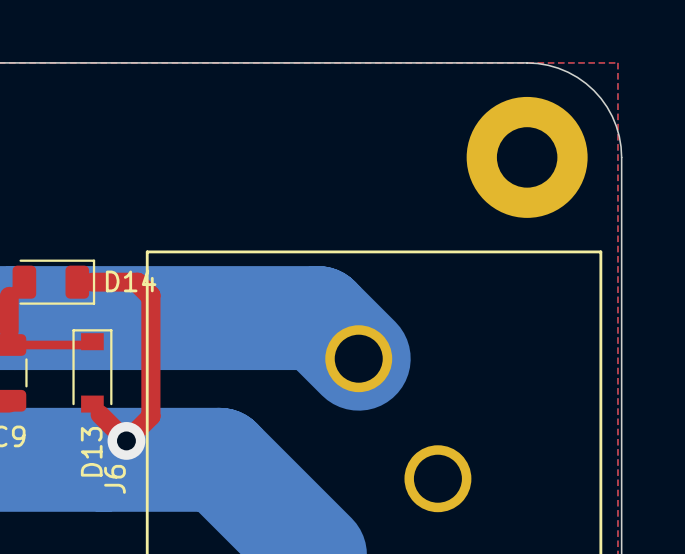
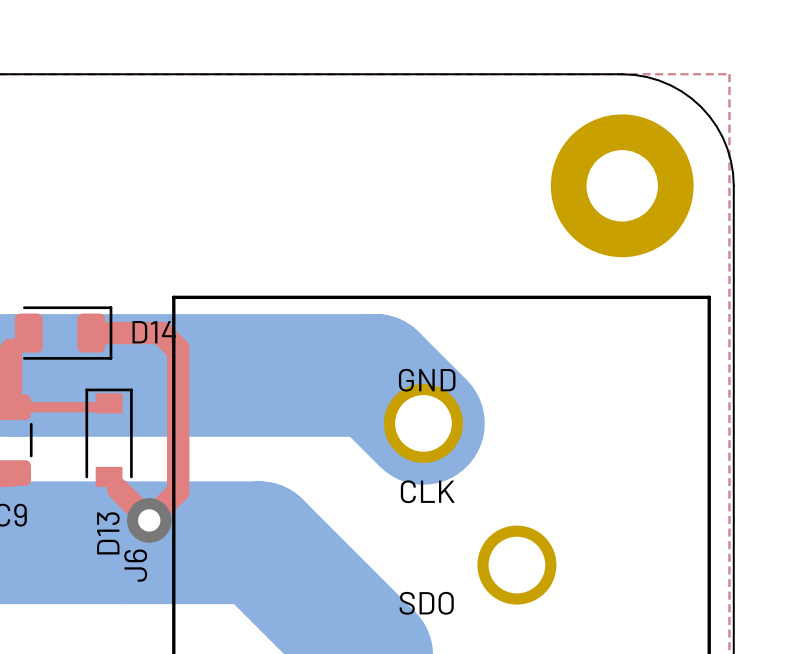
text: none -> GND (427, 380)
text: none -> CLK (427, 491)
text: none -> SDO (426, 603)

